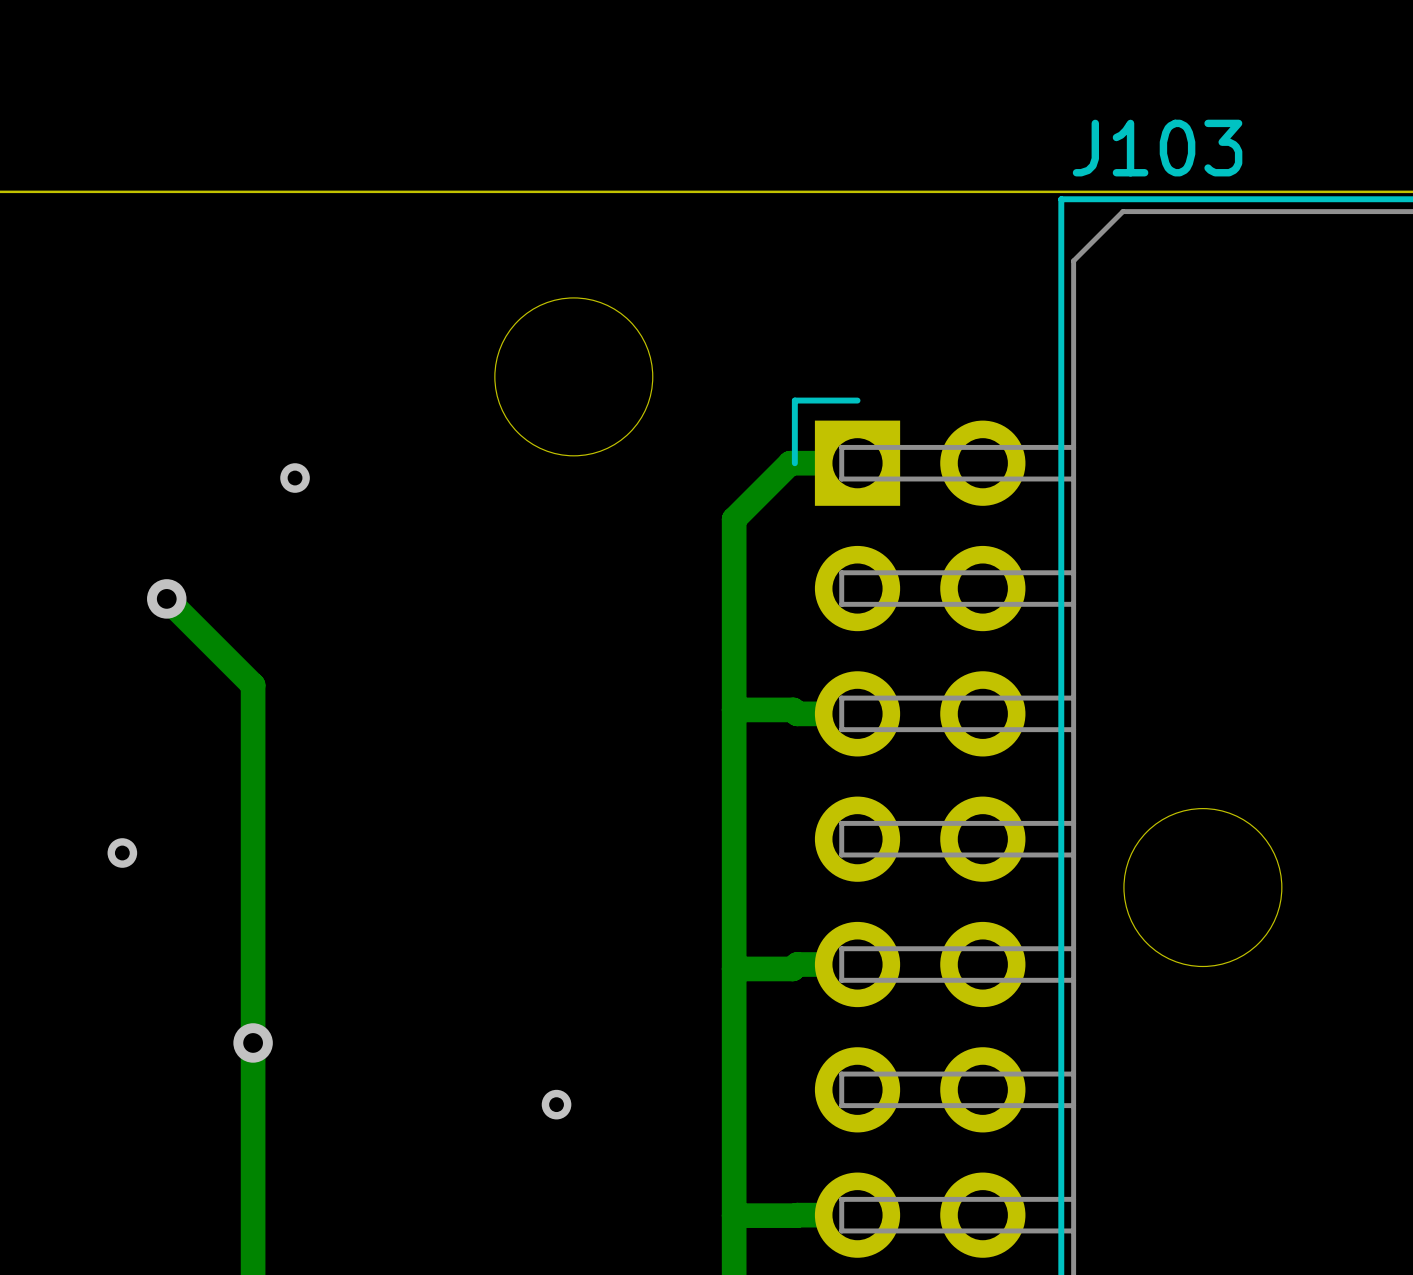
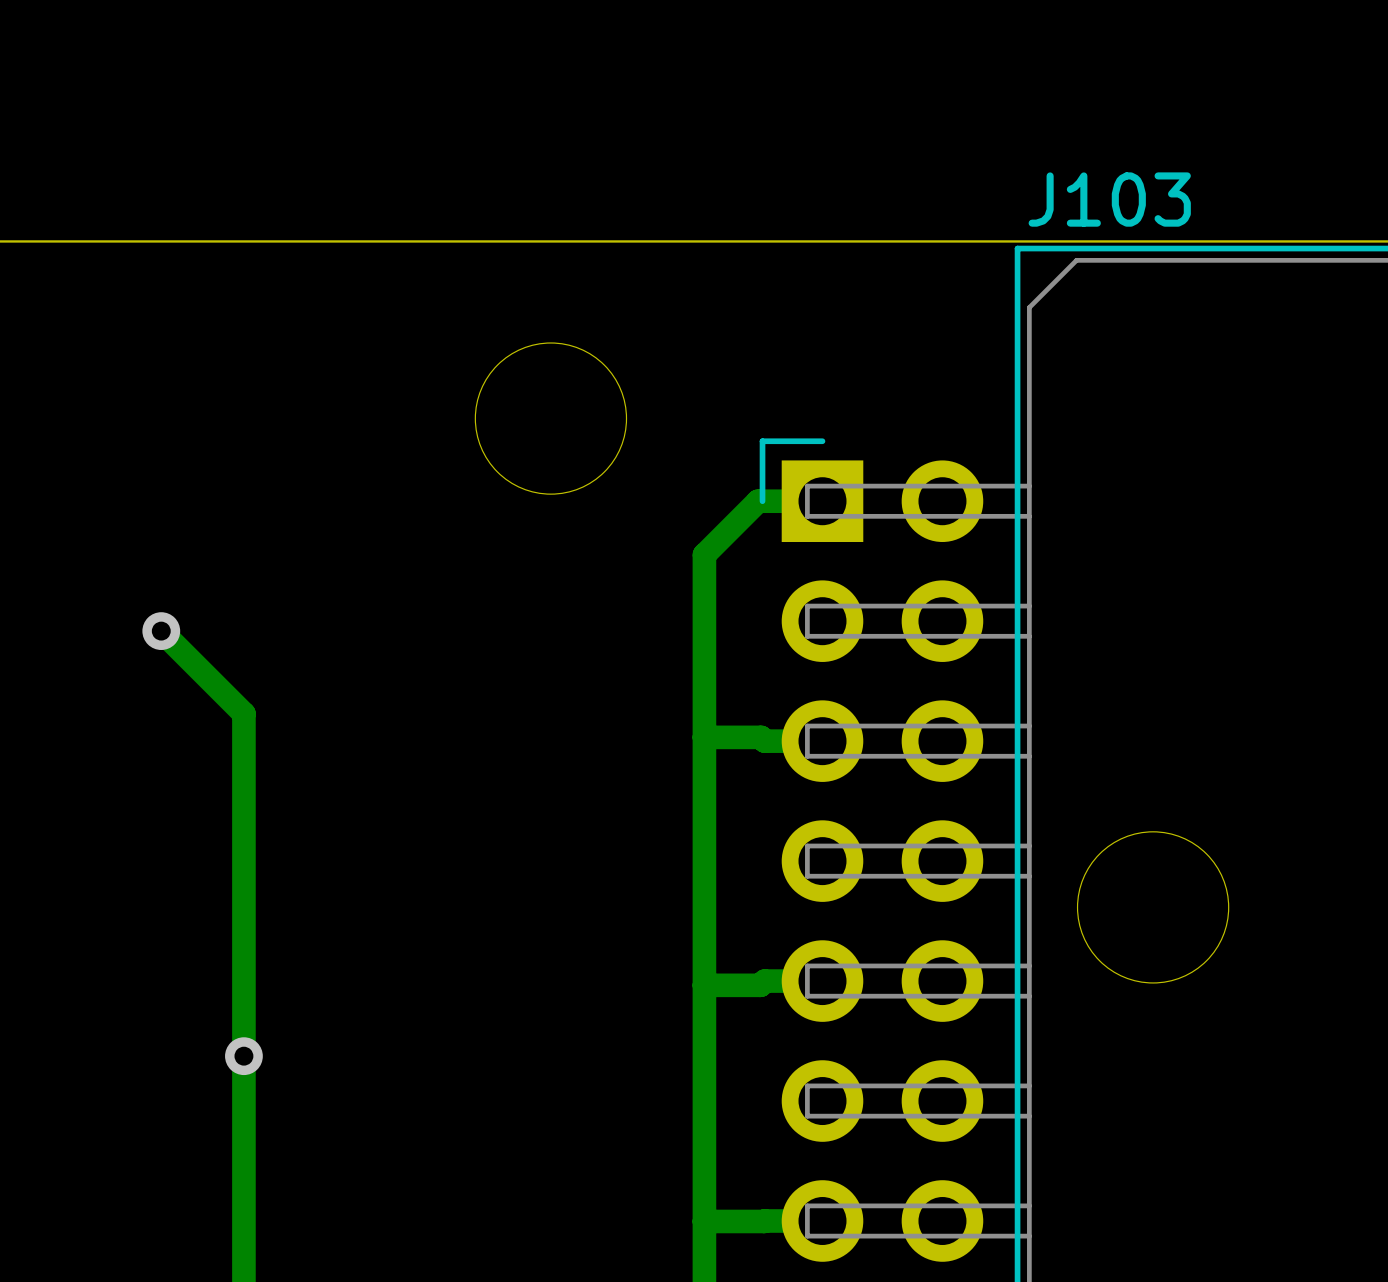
via: (295, 478) -> none
via: (122, 853) -> none
via: (556, 1104) -> none

